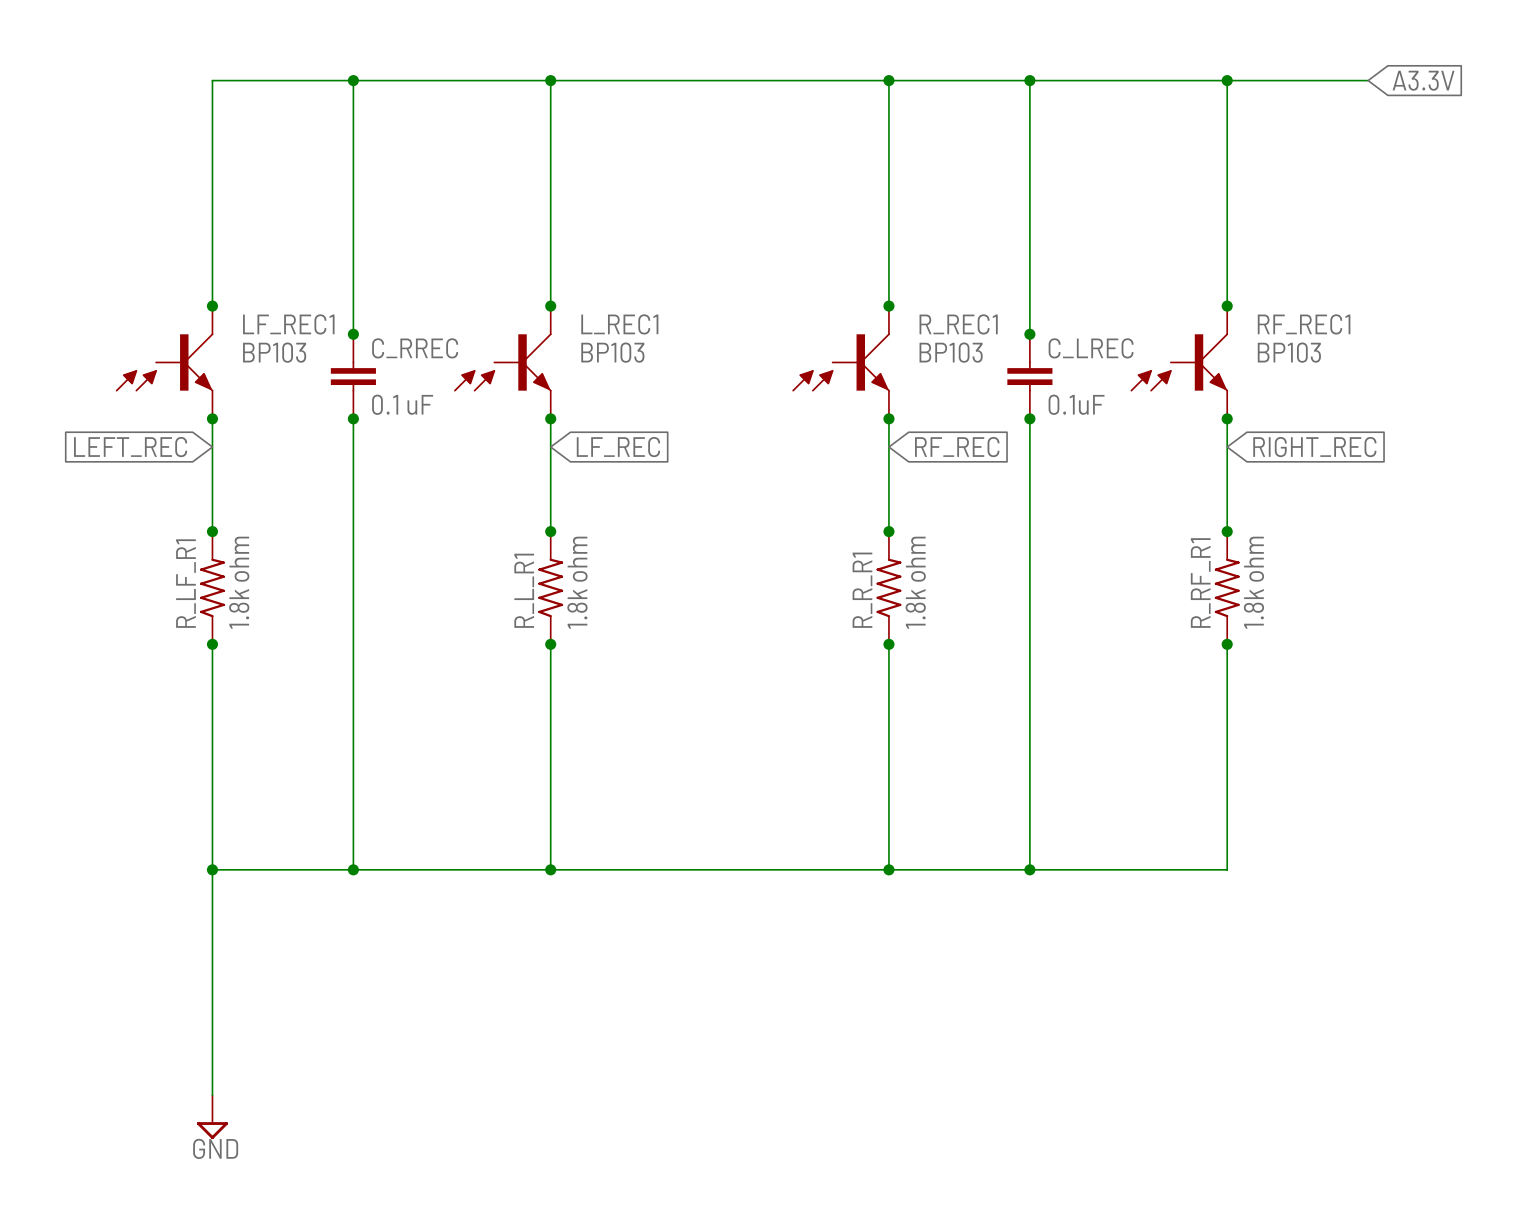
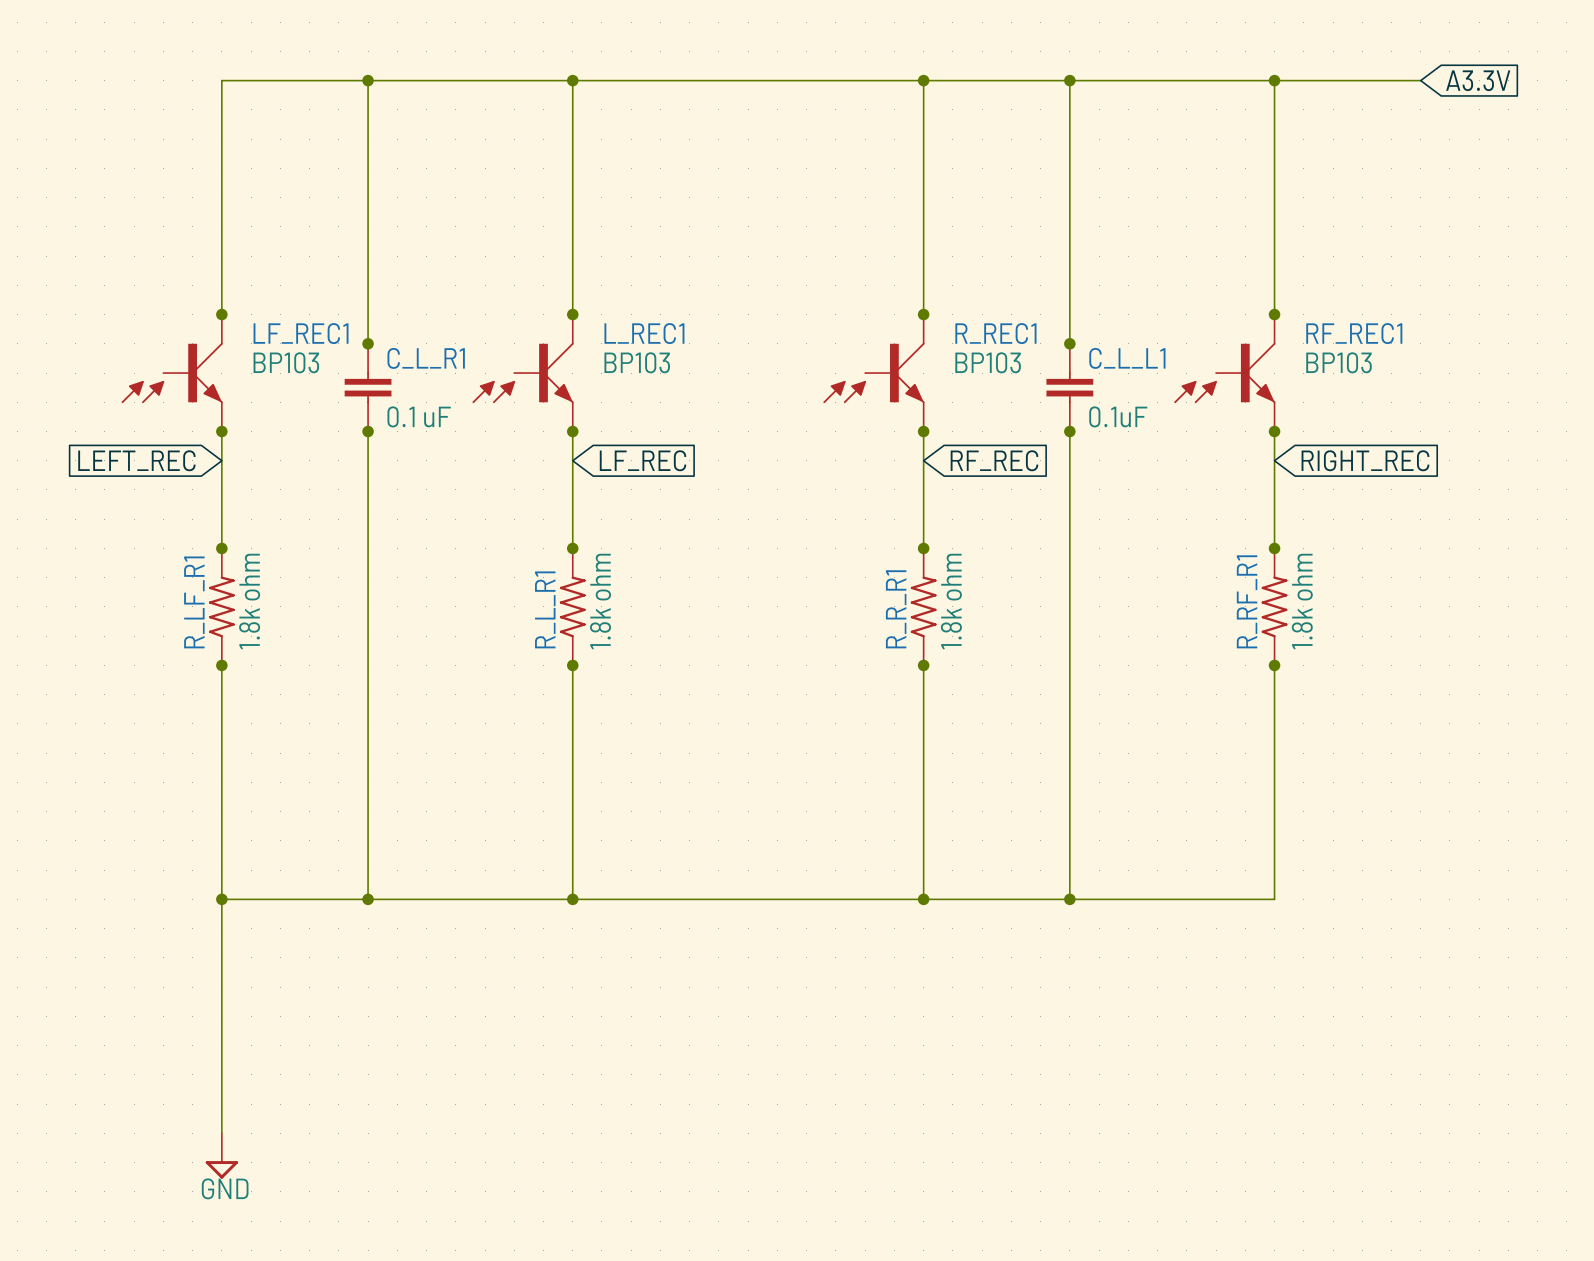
C_RREC name: C_RREC (415, 348) -> C_L_R1 (426, 358)
C_LREC name: C_LREC (1091, 348) -> C_L_L1 (1127, 358)

